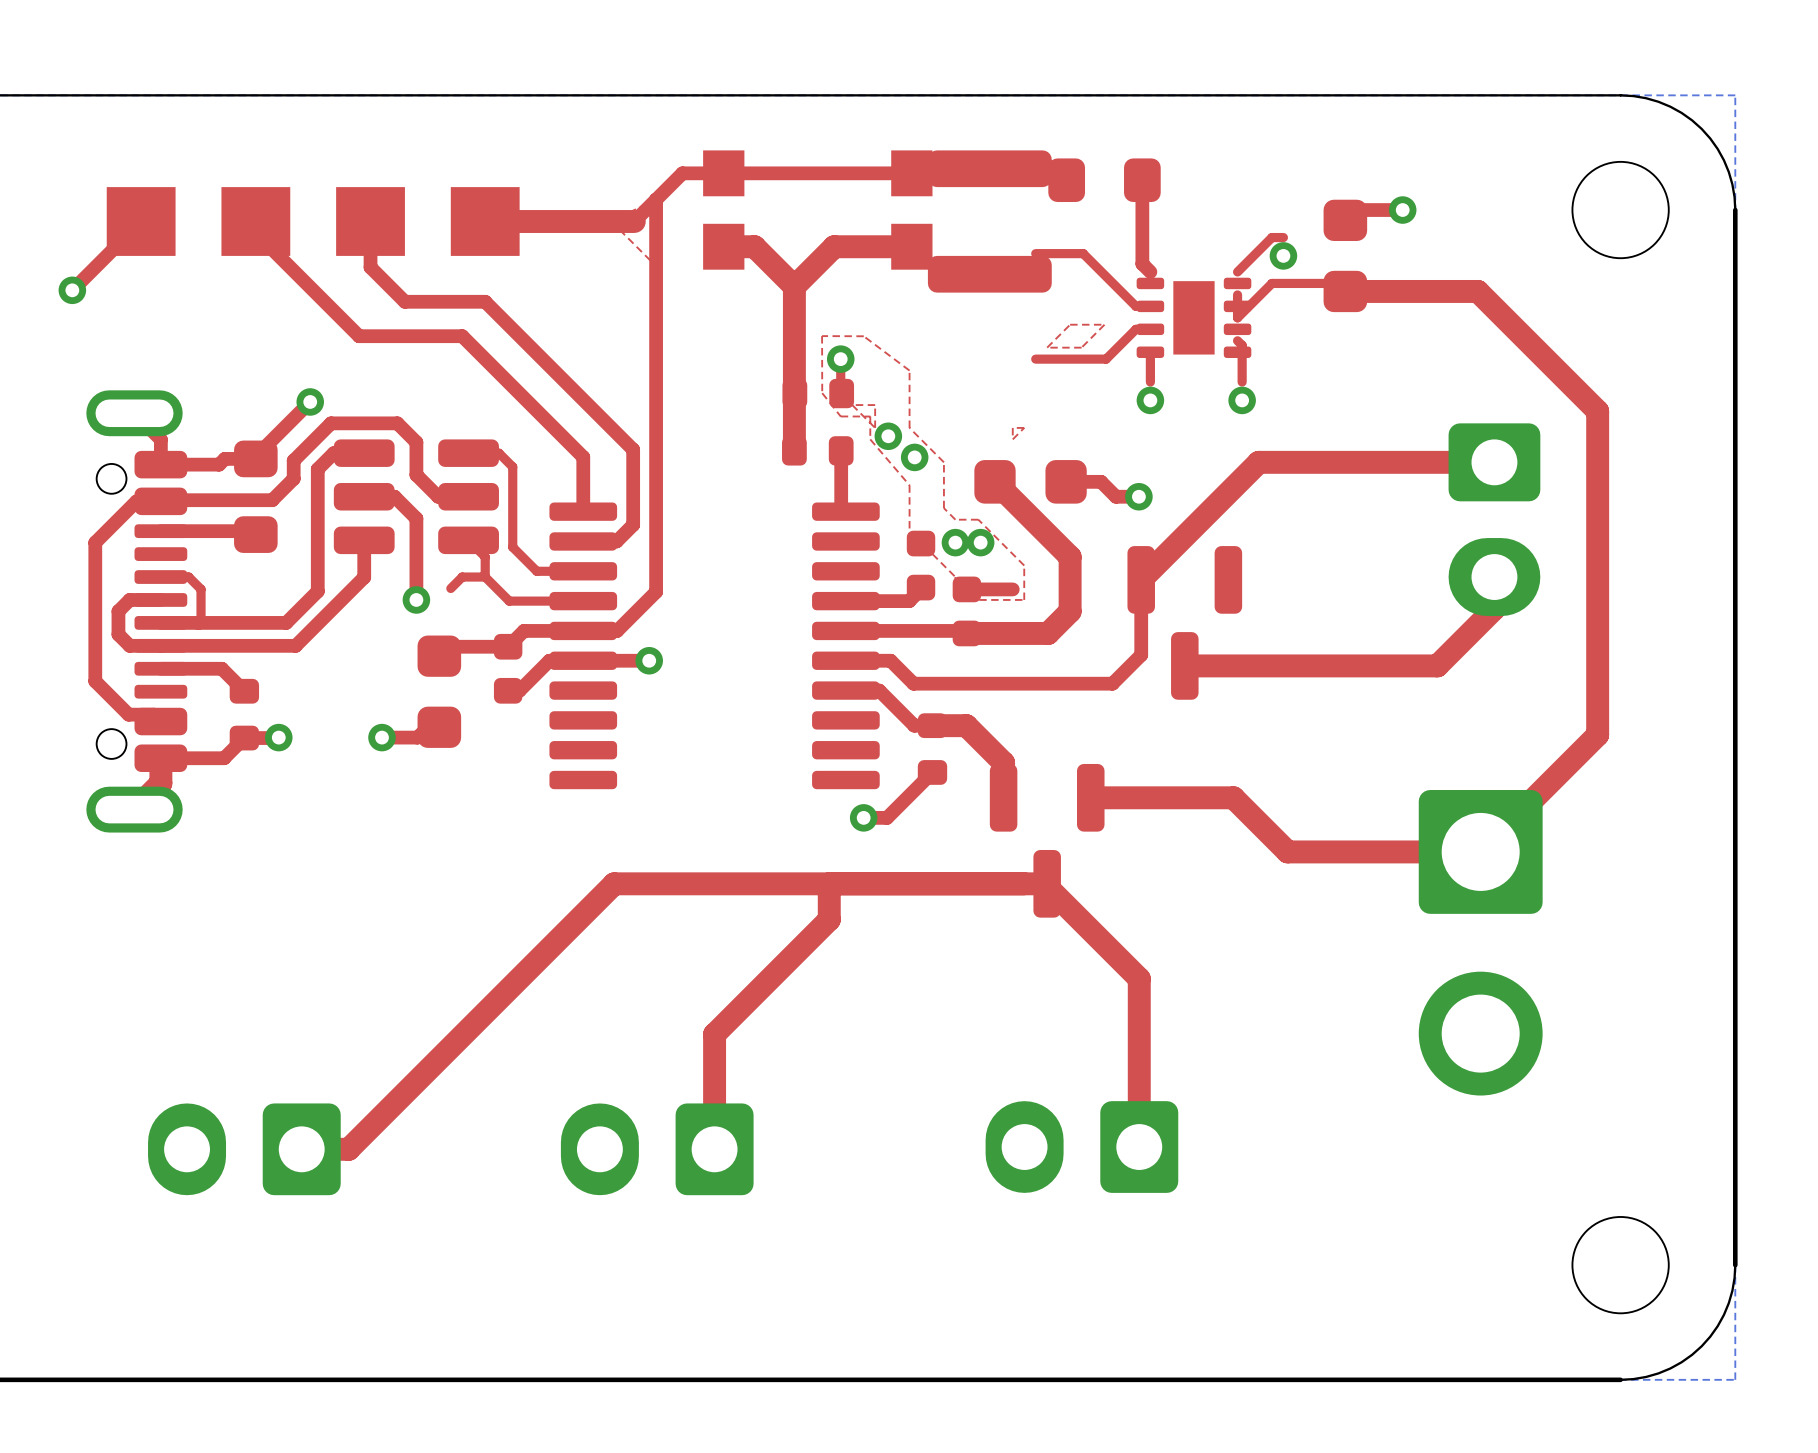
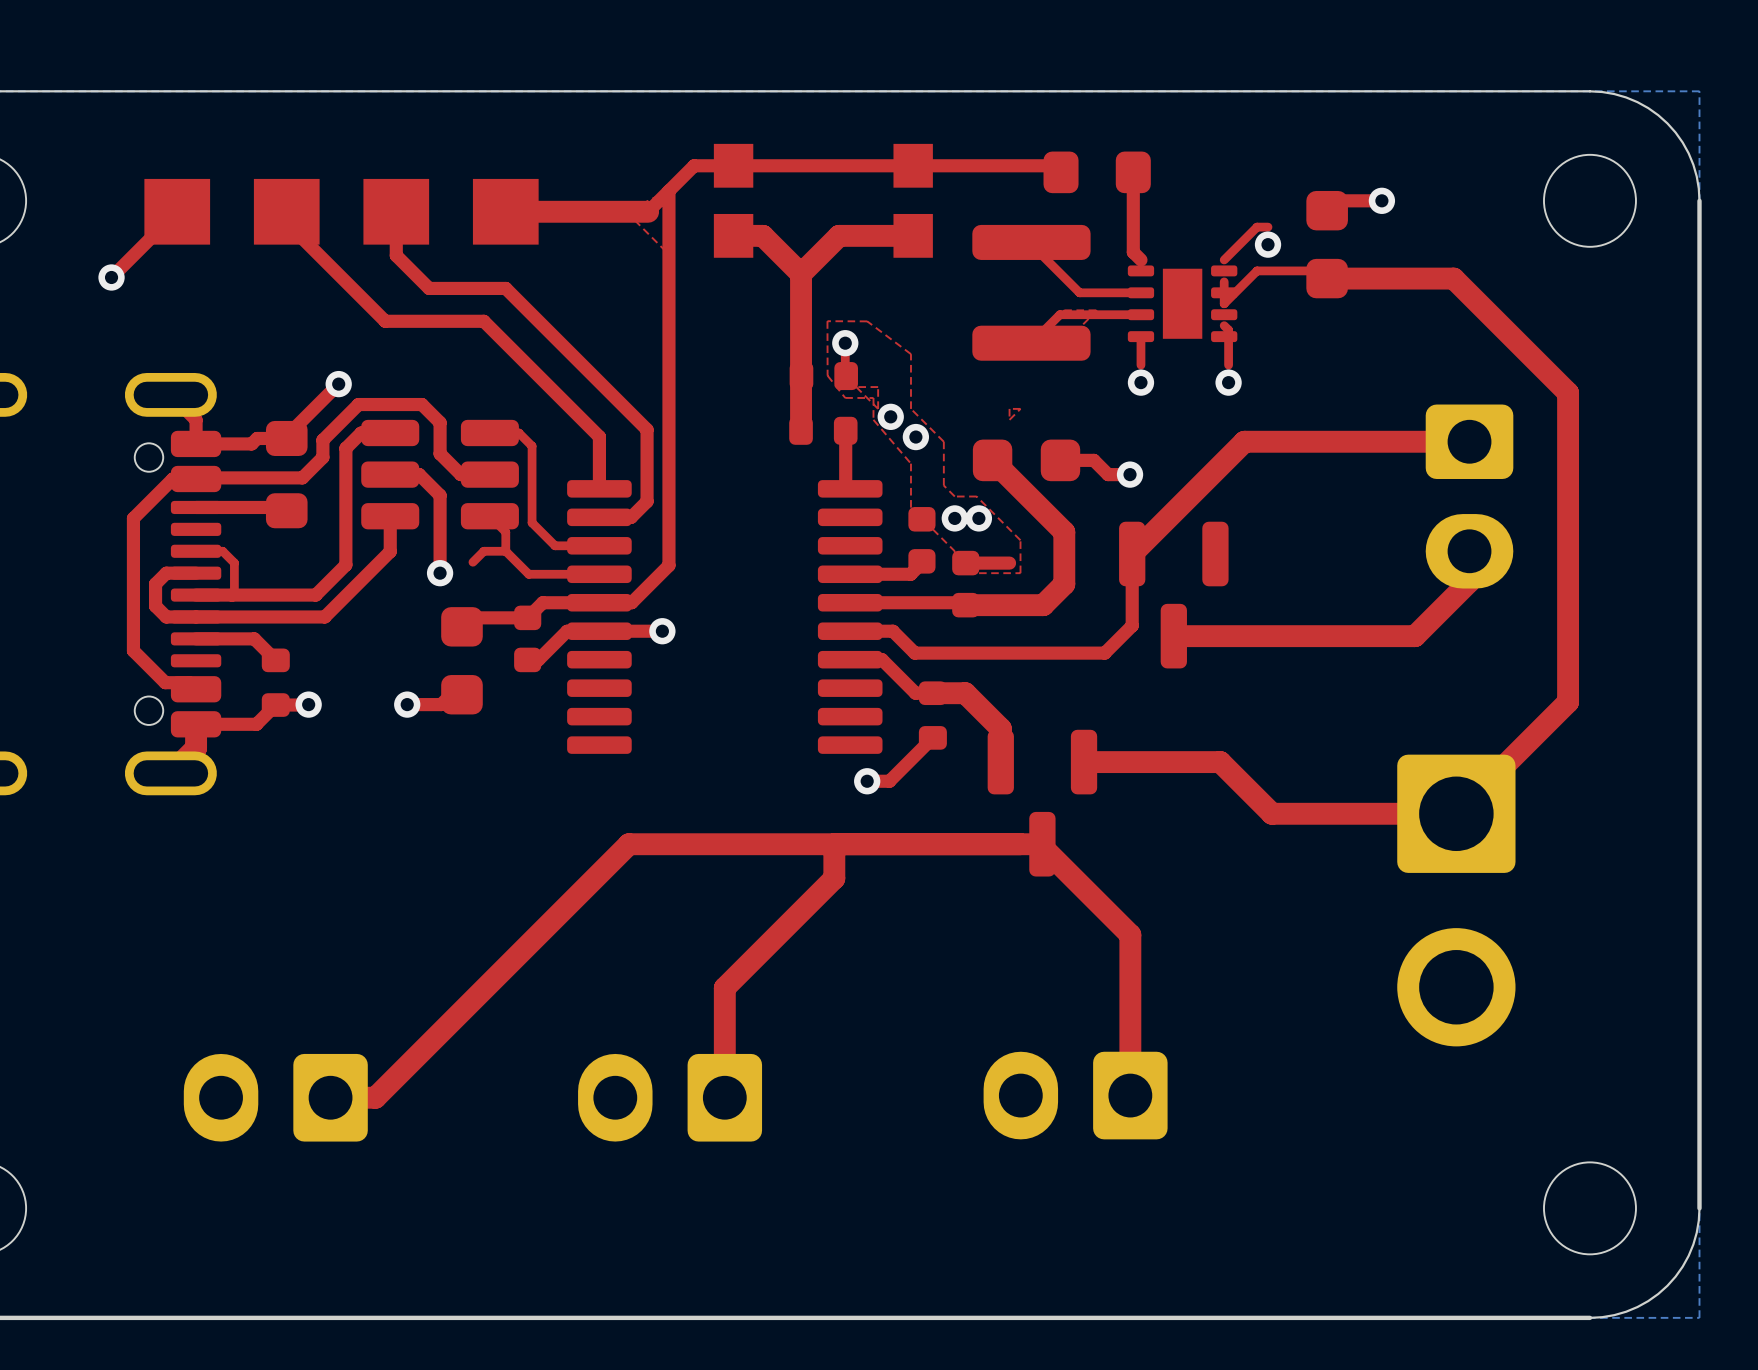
part position: (989, 221) -> (1031, 292)
top track: (1035, 253) (1083, 253) (1135, 306) -> (1035, 249) (1079, 292) (1127, 292)
top track: (1135, 329) (1106, 359) (1035, 359) -> (1127, 314) (1059, 314) (1031, 343)

